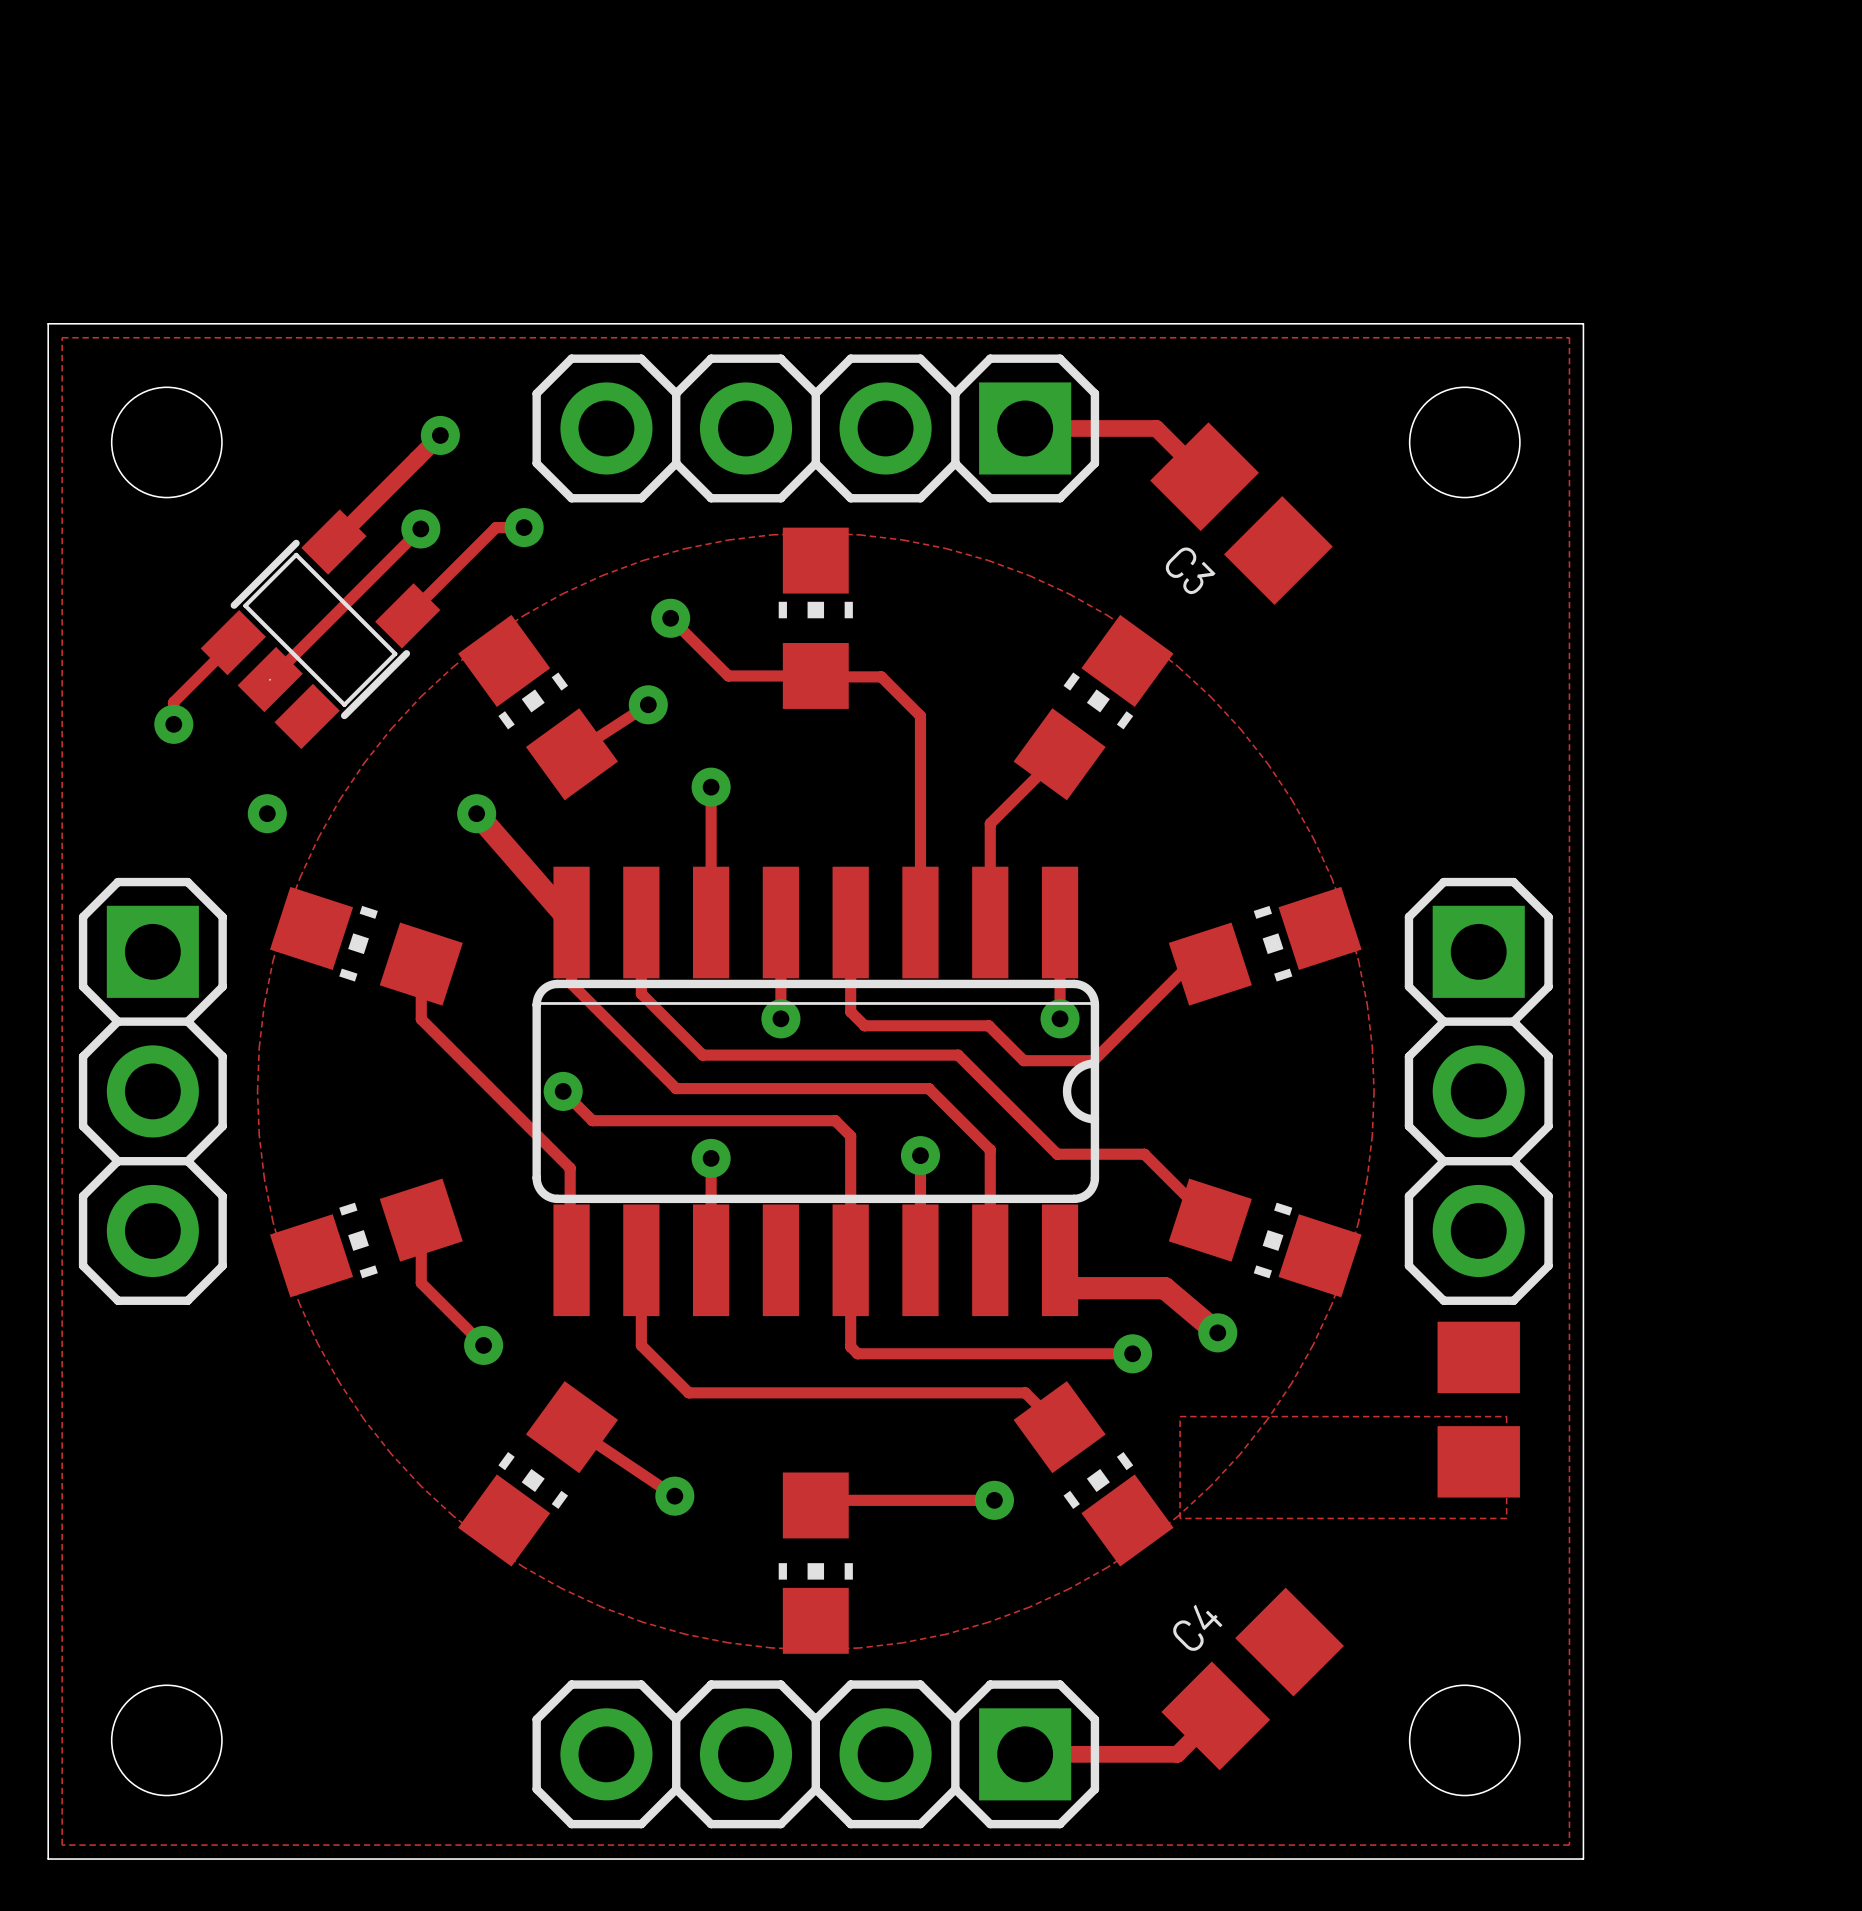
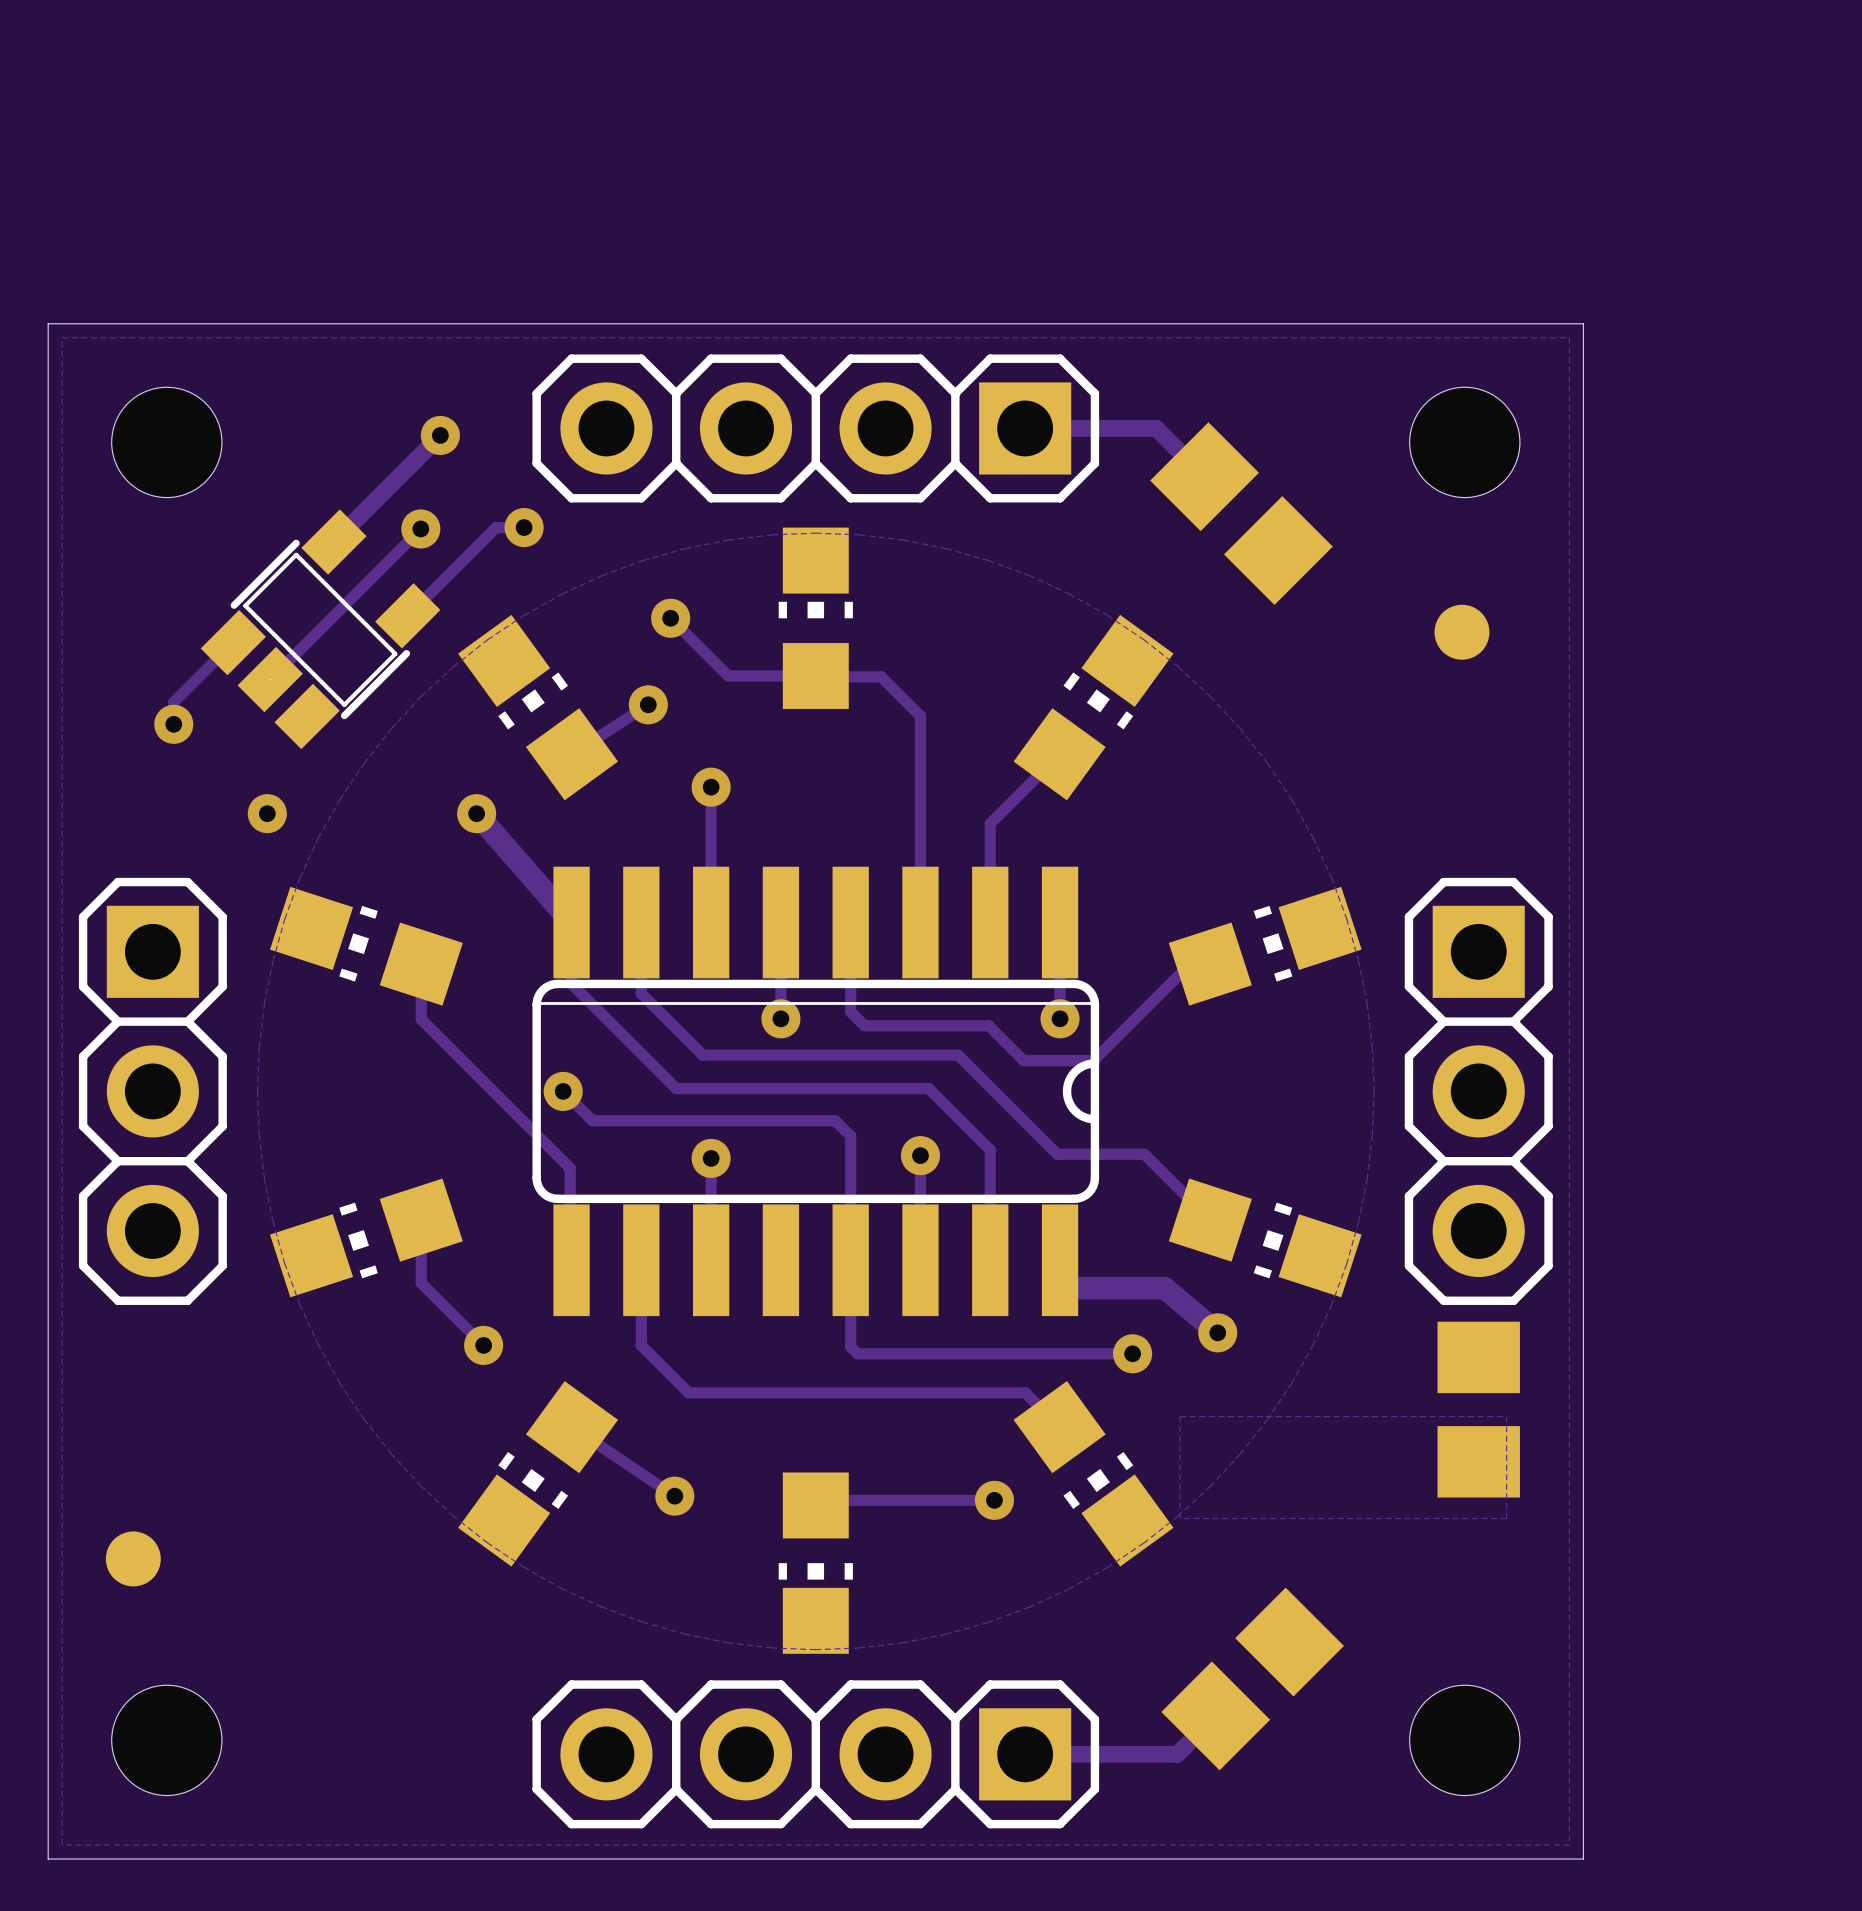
C3 name: C3 (1190, 570) -> none
part: none -> (1461, 632)
part: none -> (133, 1558)
C4 name: C4 (1197, 1627) -> none

